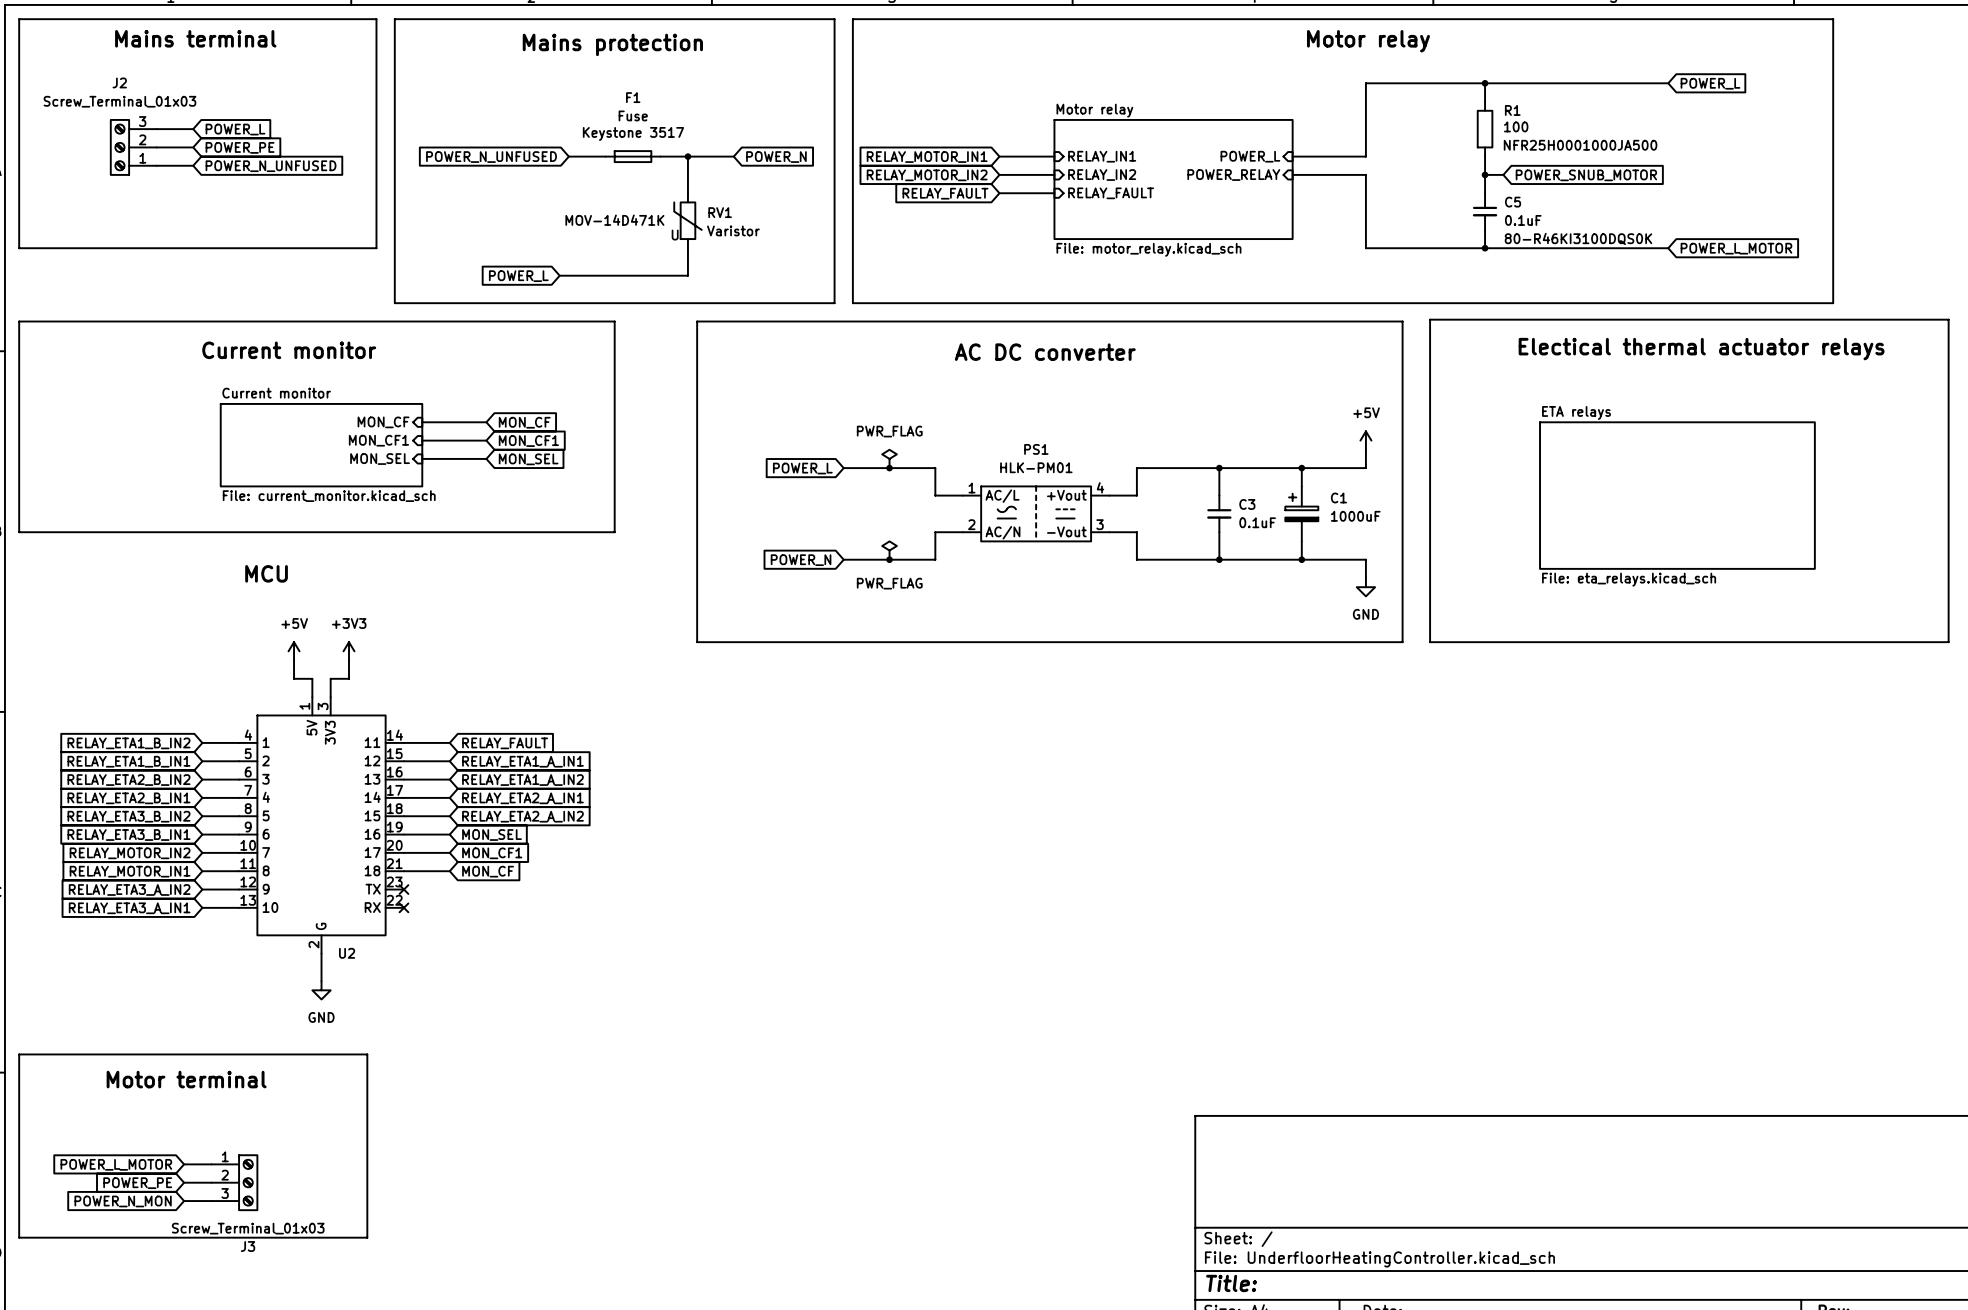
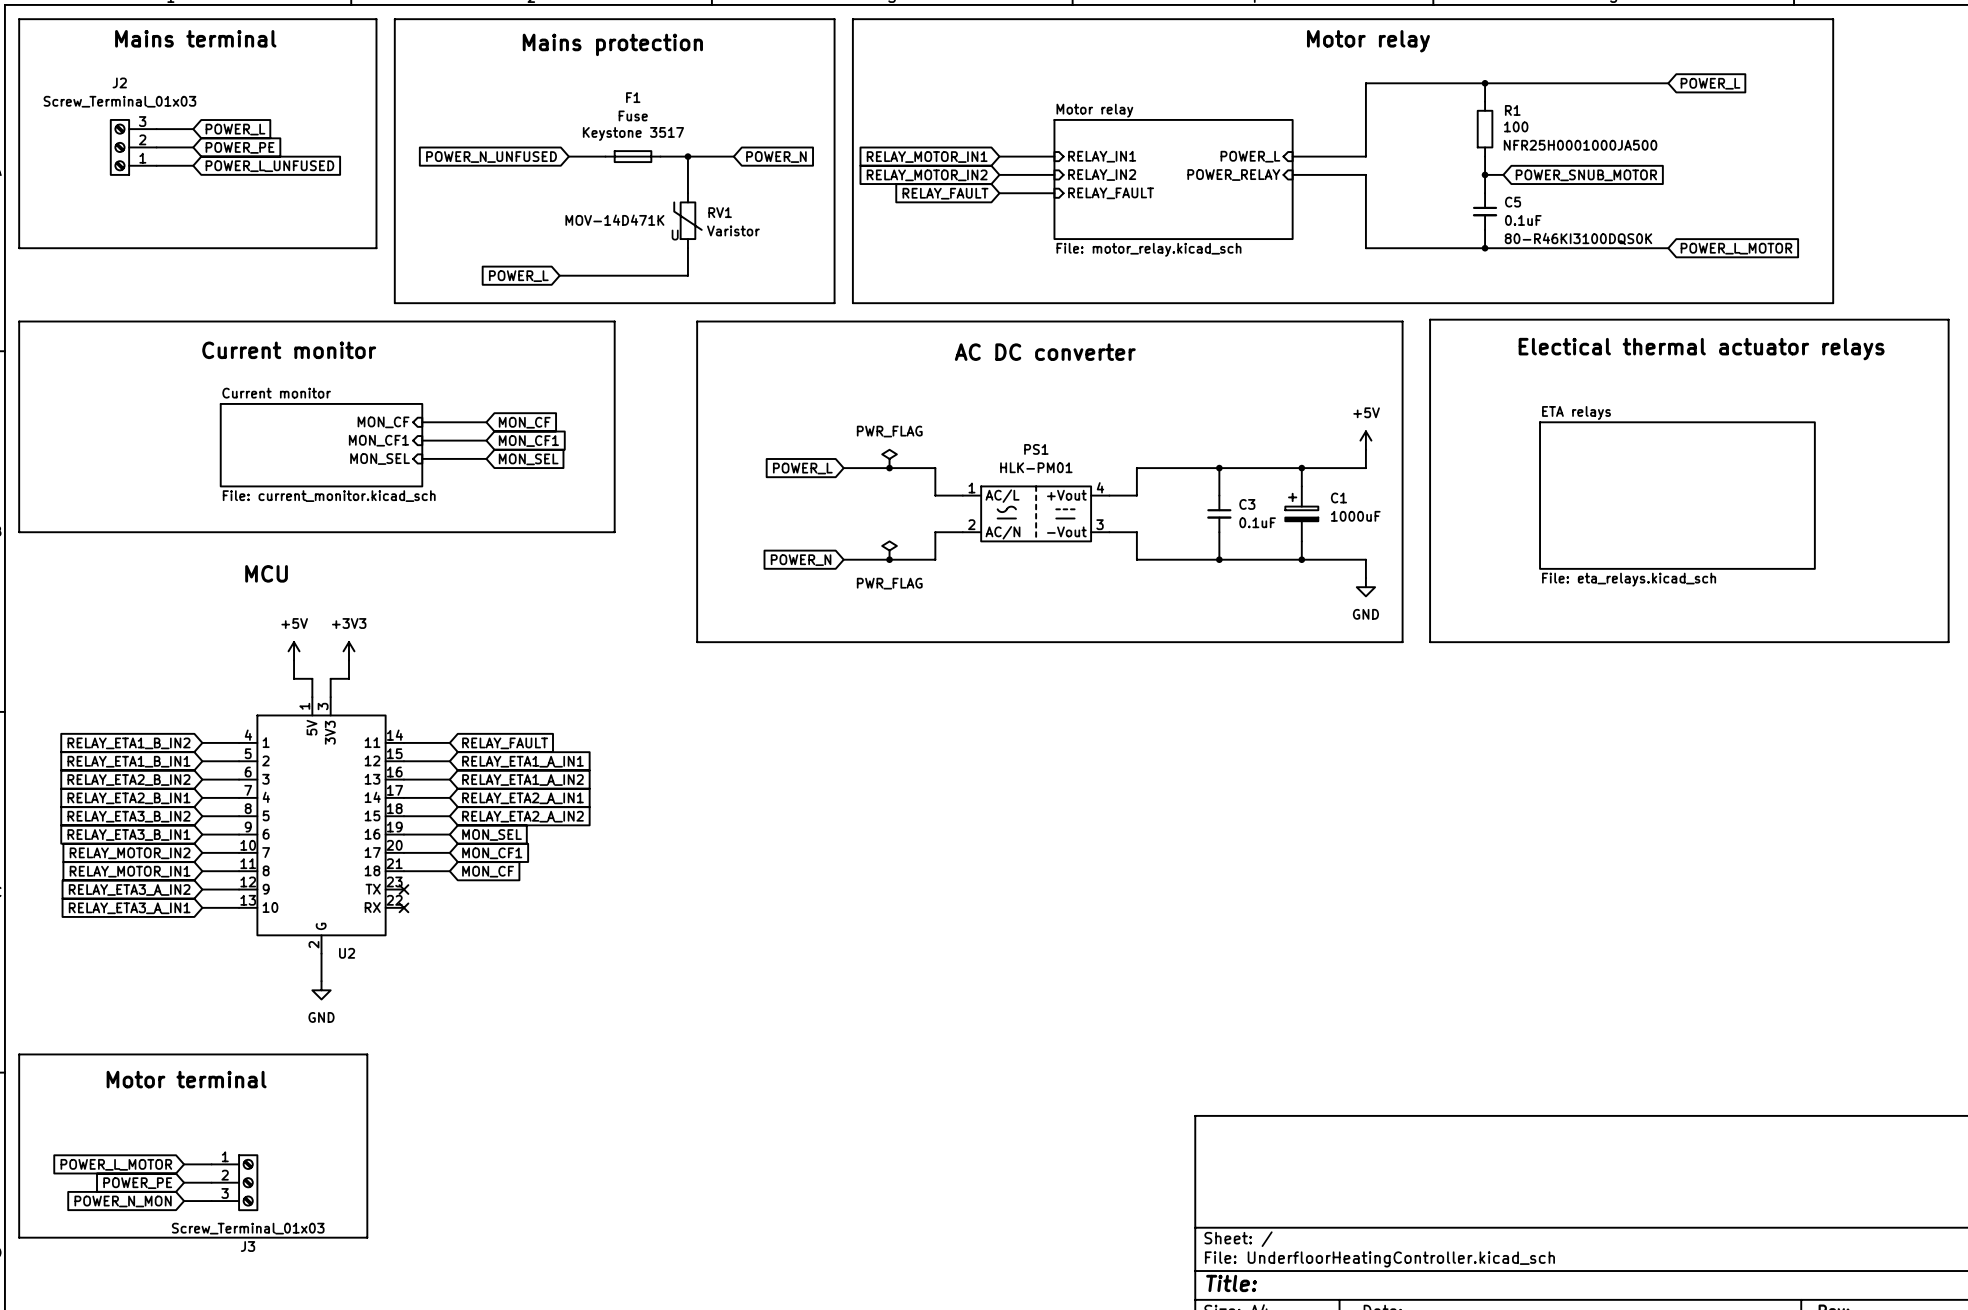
global label: POWER_N_UNFUSED (271, 166) -> POWER_L_UNFUSED (269, 166)

